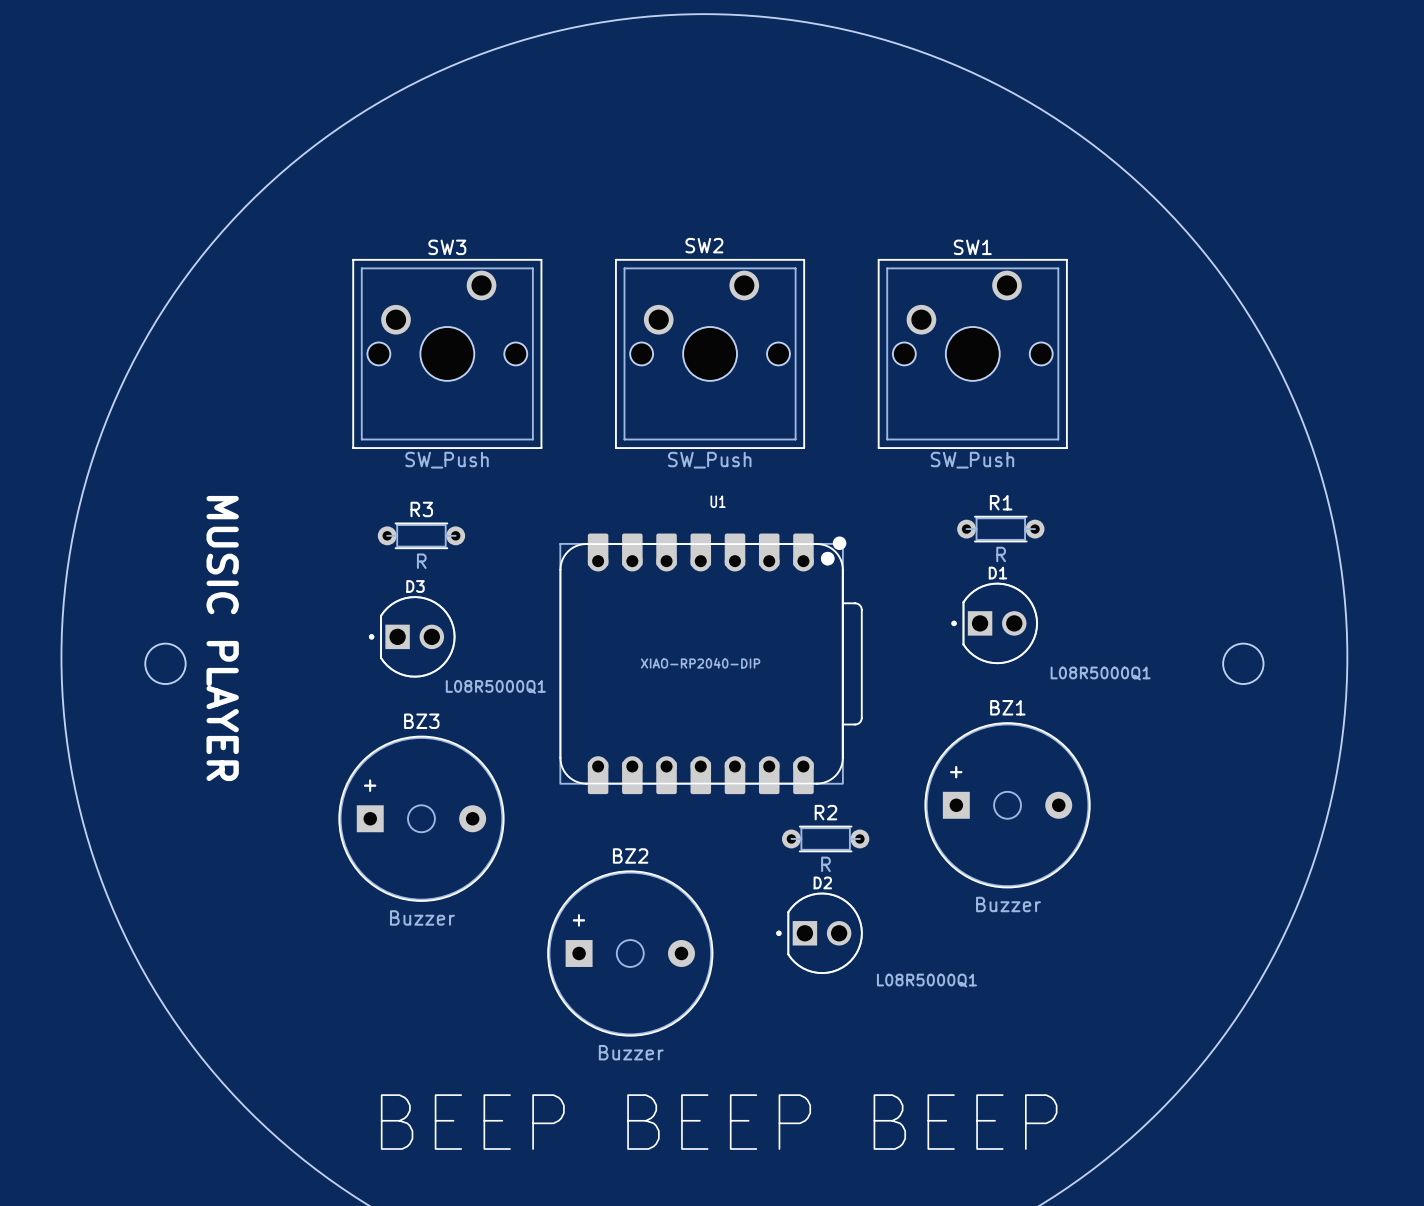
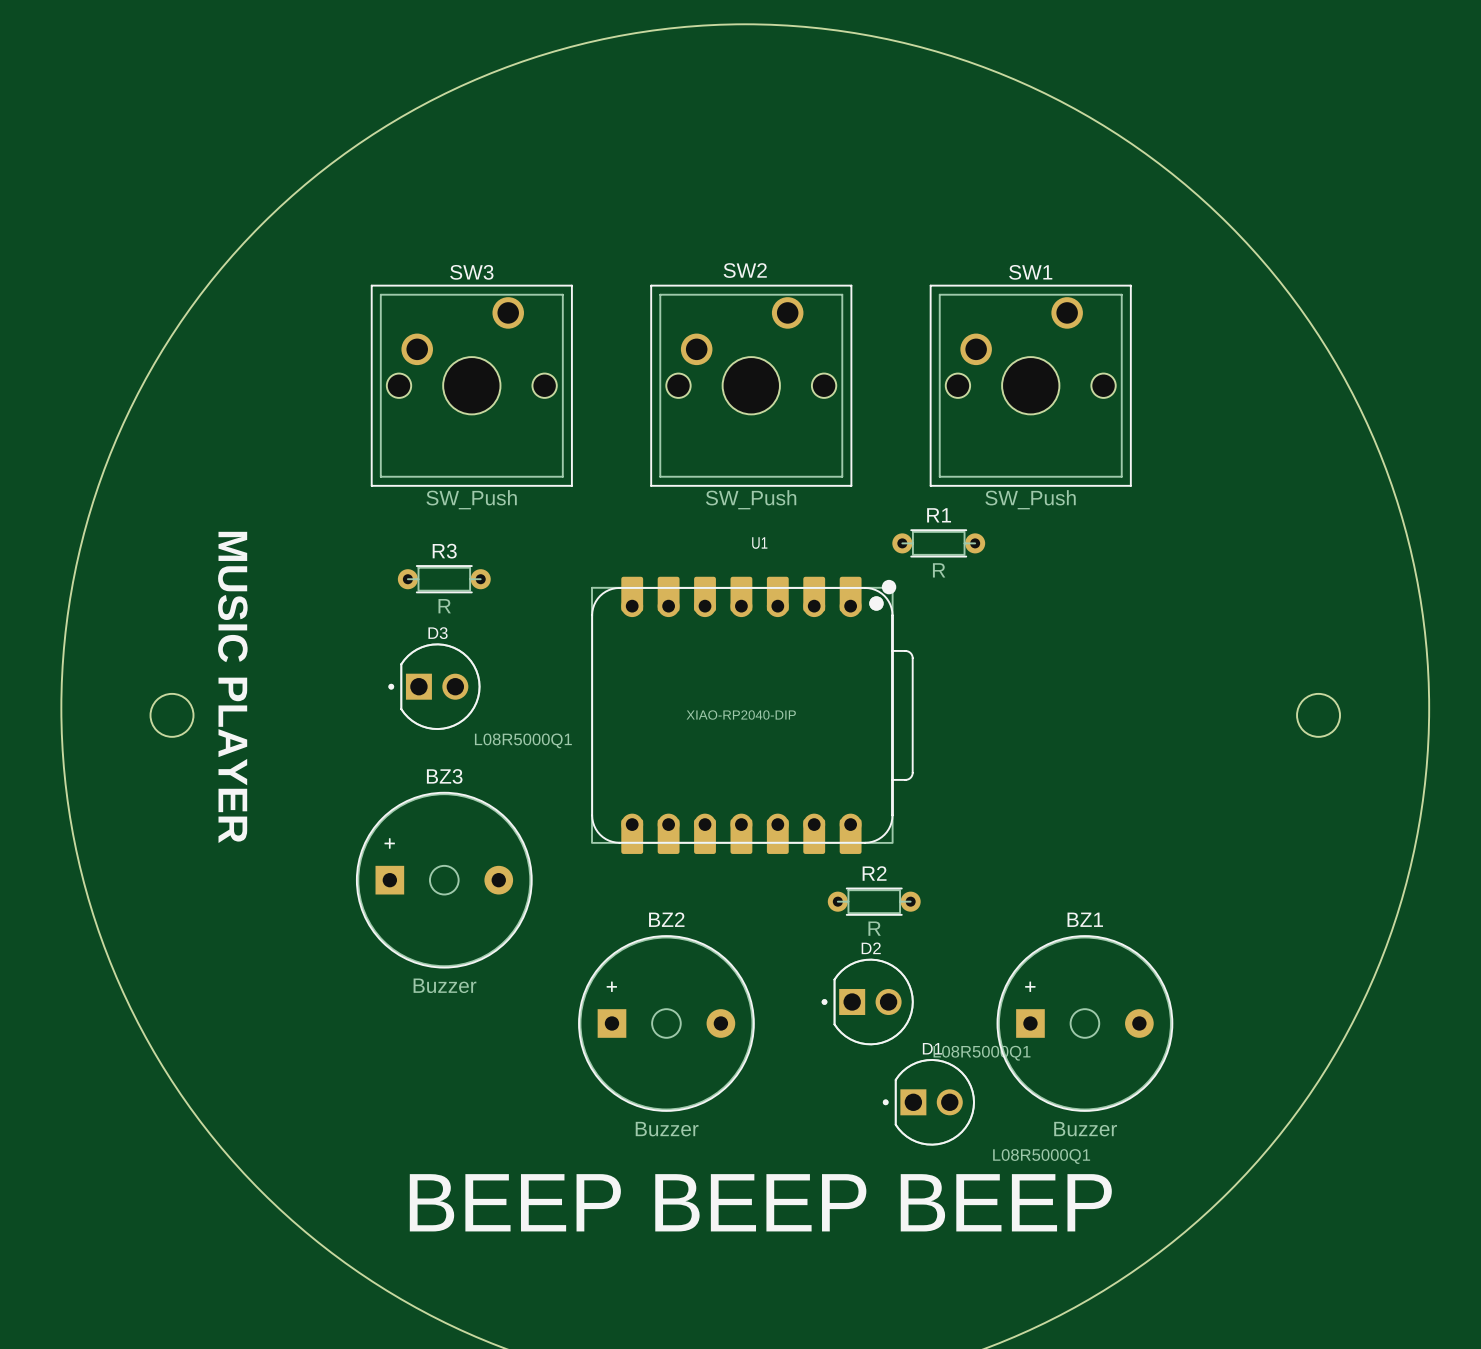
R1 position: (1000, 529) -> (938, 543)
D1 position: (994, 623) -> (928, 1102)
BZ1 position: (1007, 805) -> (1084, 1023)

